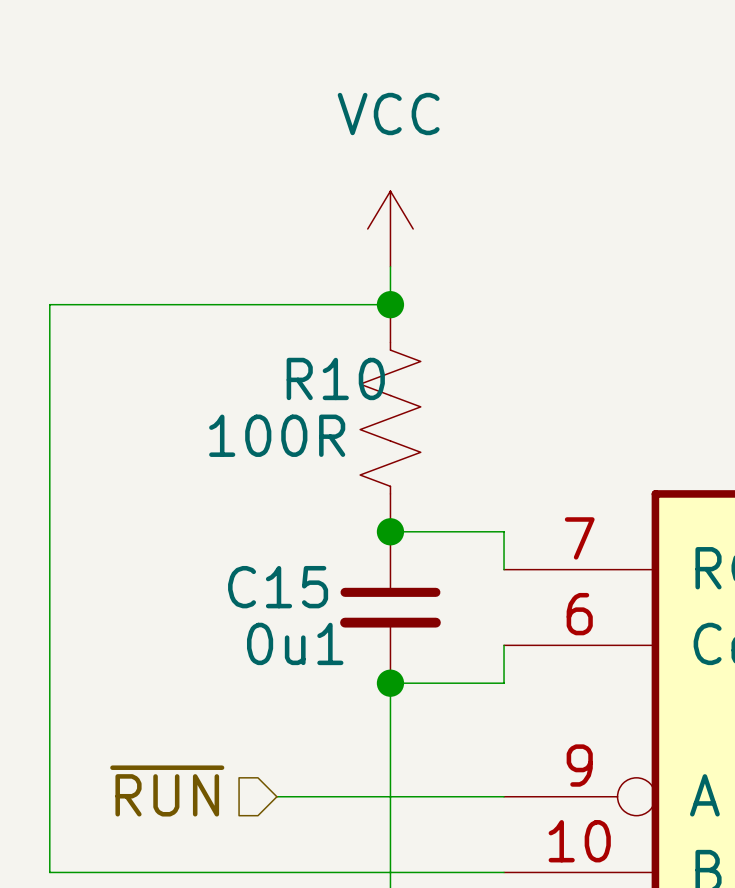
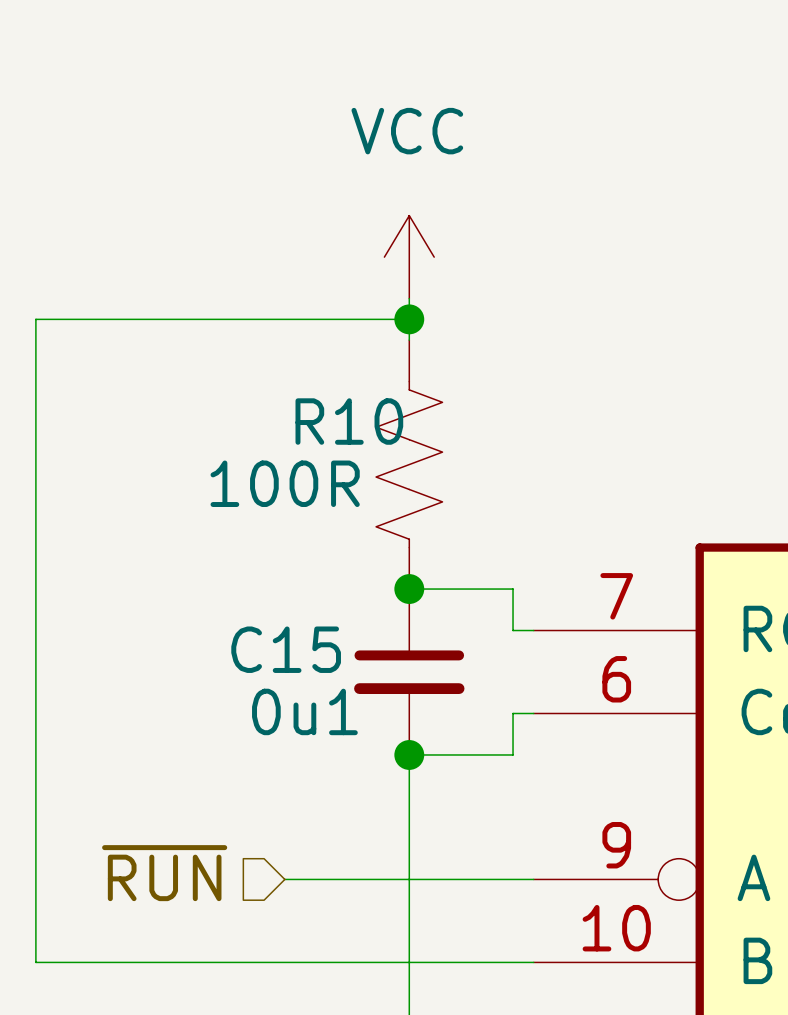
wire: (49, 304) (390, 304) -> (35, 340) (35, 319) (409, 319)
junction position: (390, 304) -> (409, 319)
wire: (485, 531) (504, 531) (504, 569) -> (513, 589) (513, 630) (533, 630)
wire: (504, 645) (504, 683) (485, 683) -> (533, 713) (513, 713) (513, 754)

